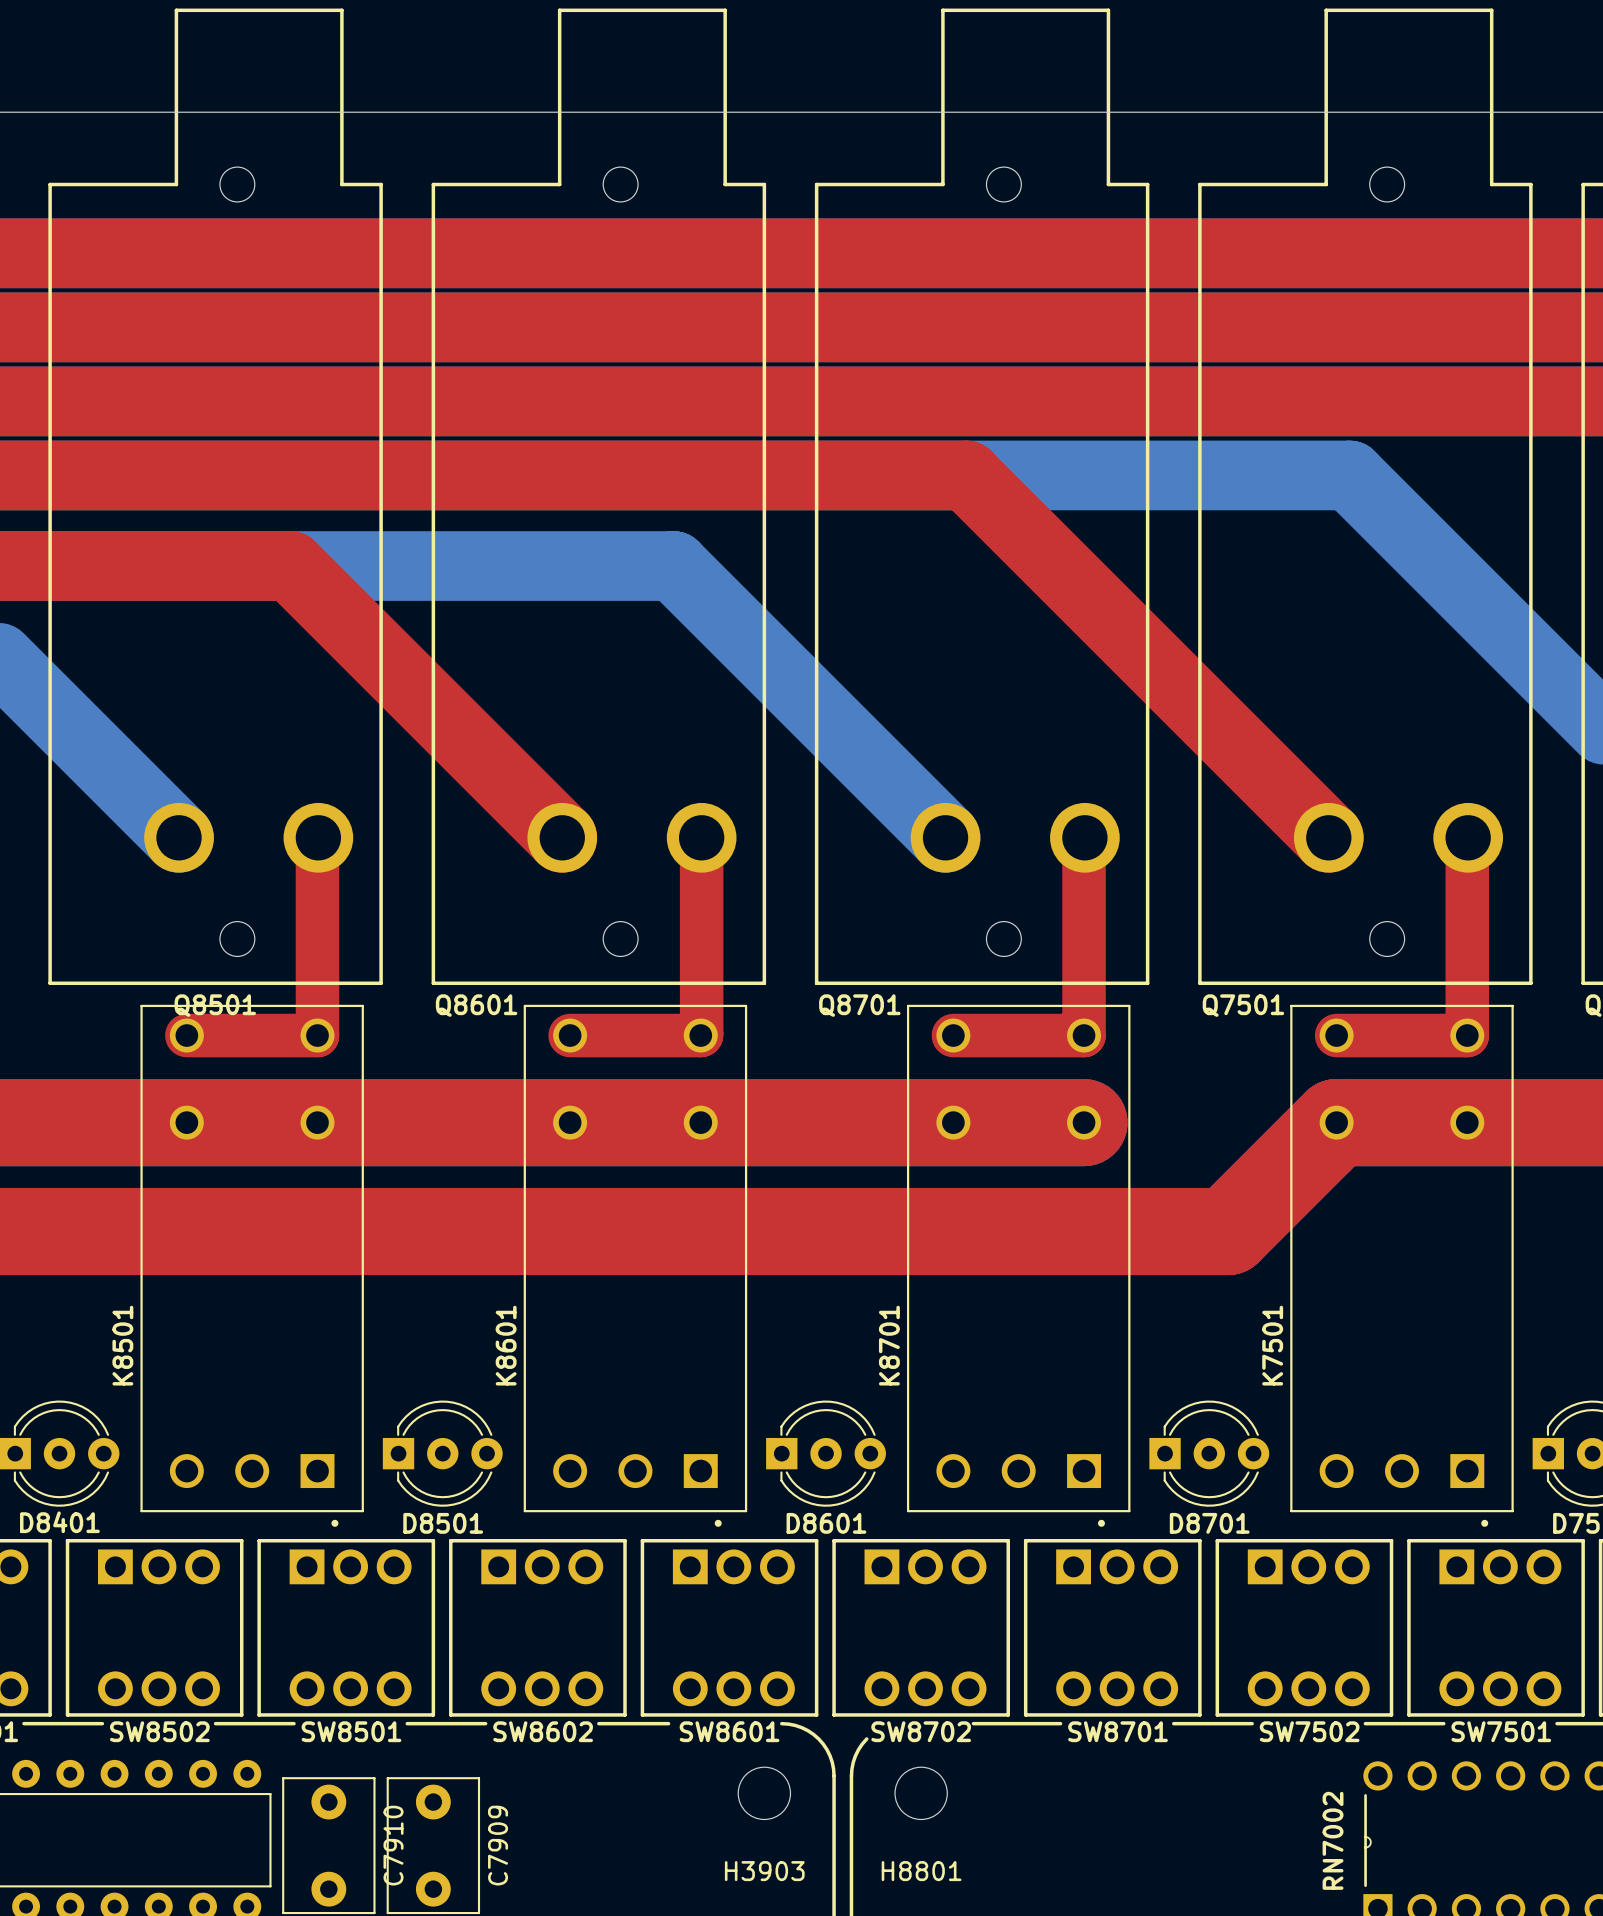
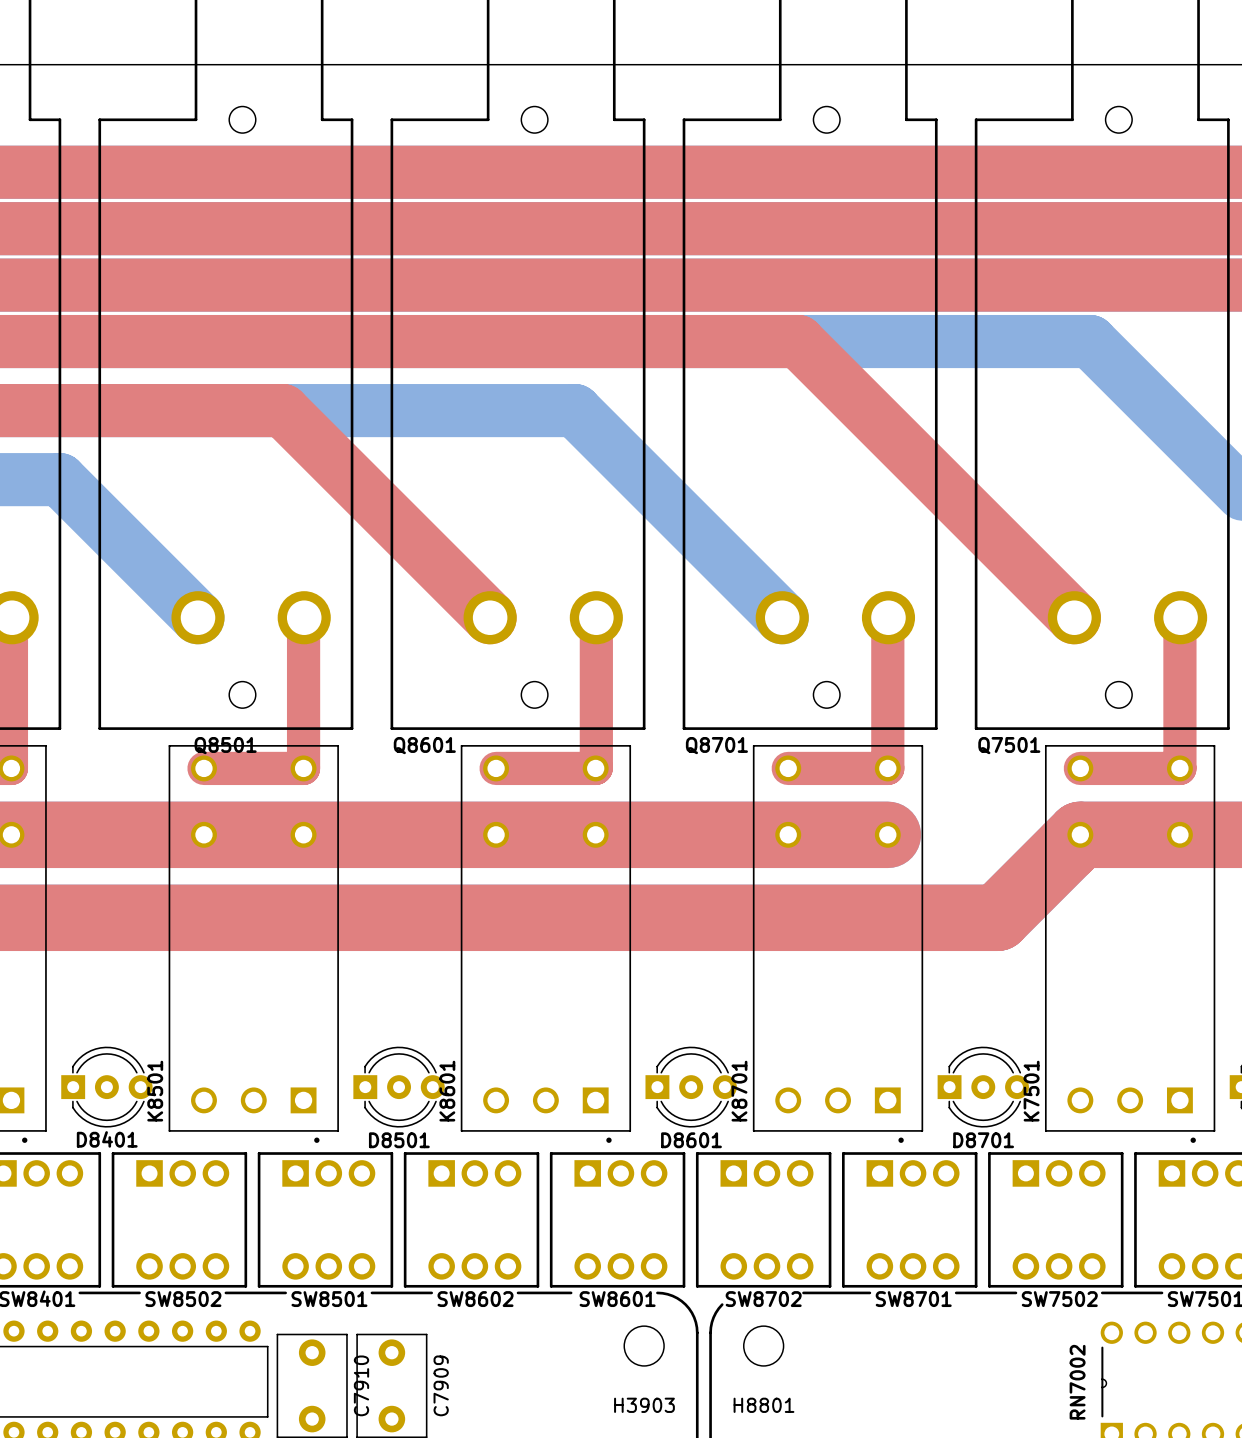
K8501 name position: K8501 (122, 1345) -> K8501 (155, 1091)
K8601 name position: K8601 (506, 1345) -> K8601 (447, 1091)
K8701 name position: K8701 (889, 1345) -> K8701 (739, 1091)
K7501 name position: K7501 (1272, 1345) -> K7501 (1031, 1091)

